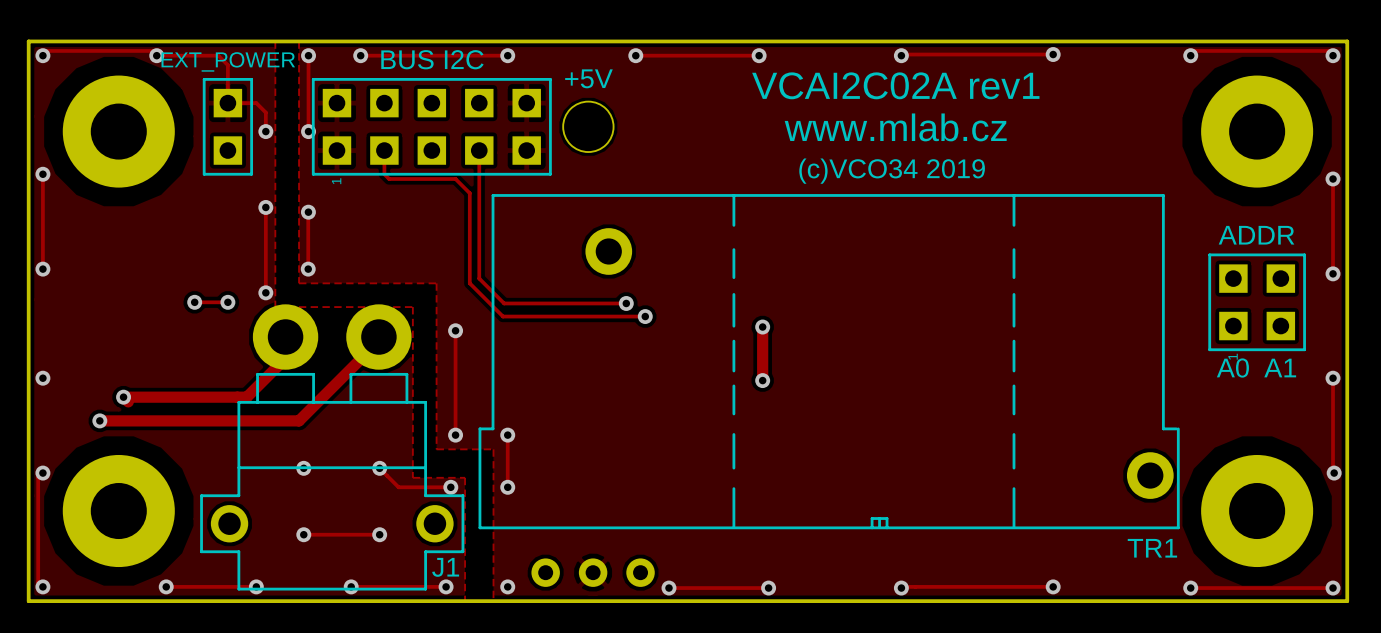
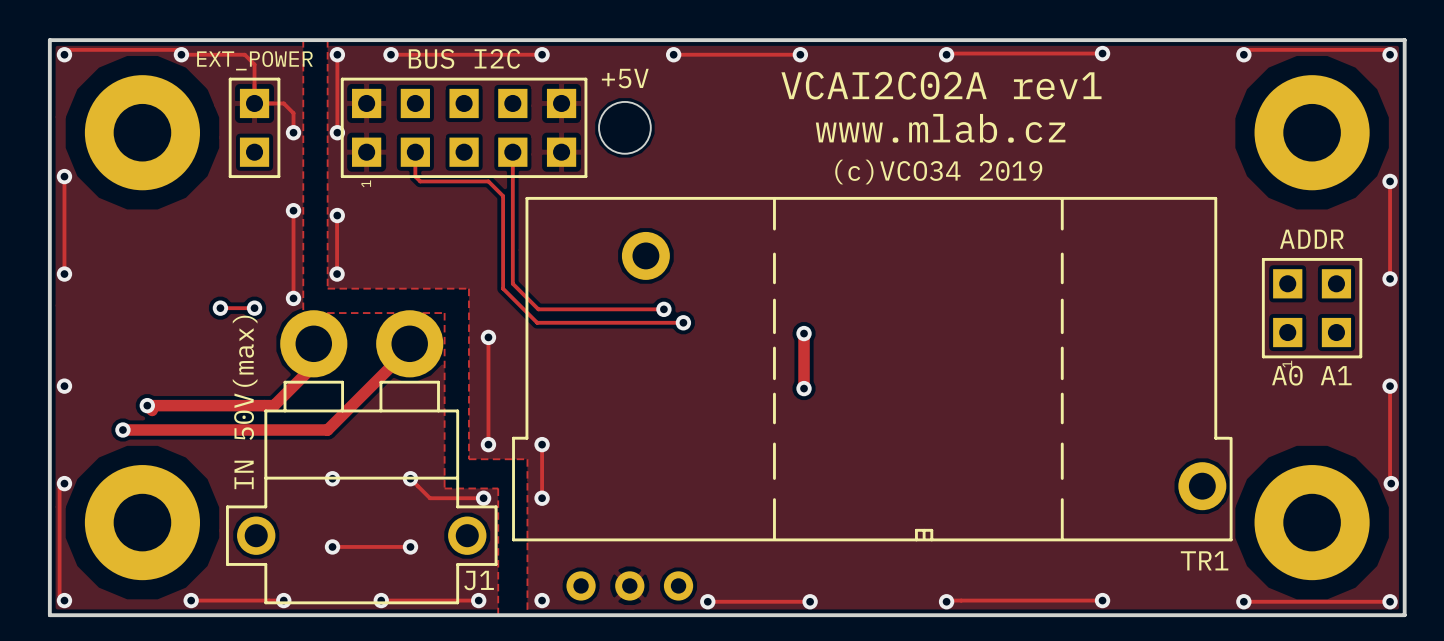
J1 value: none -> IN 50V(max) (245, 402)

